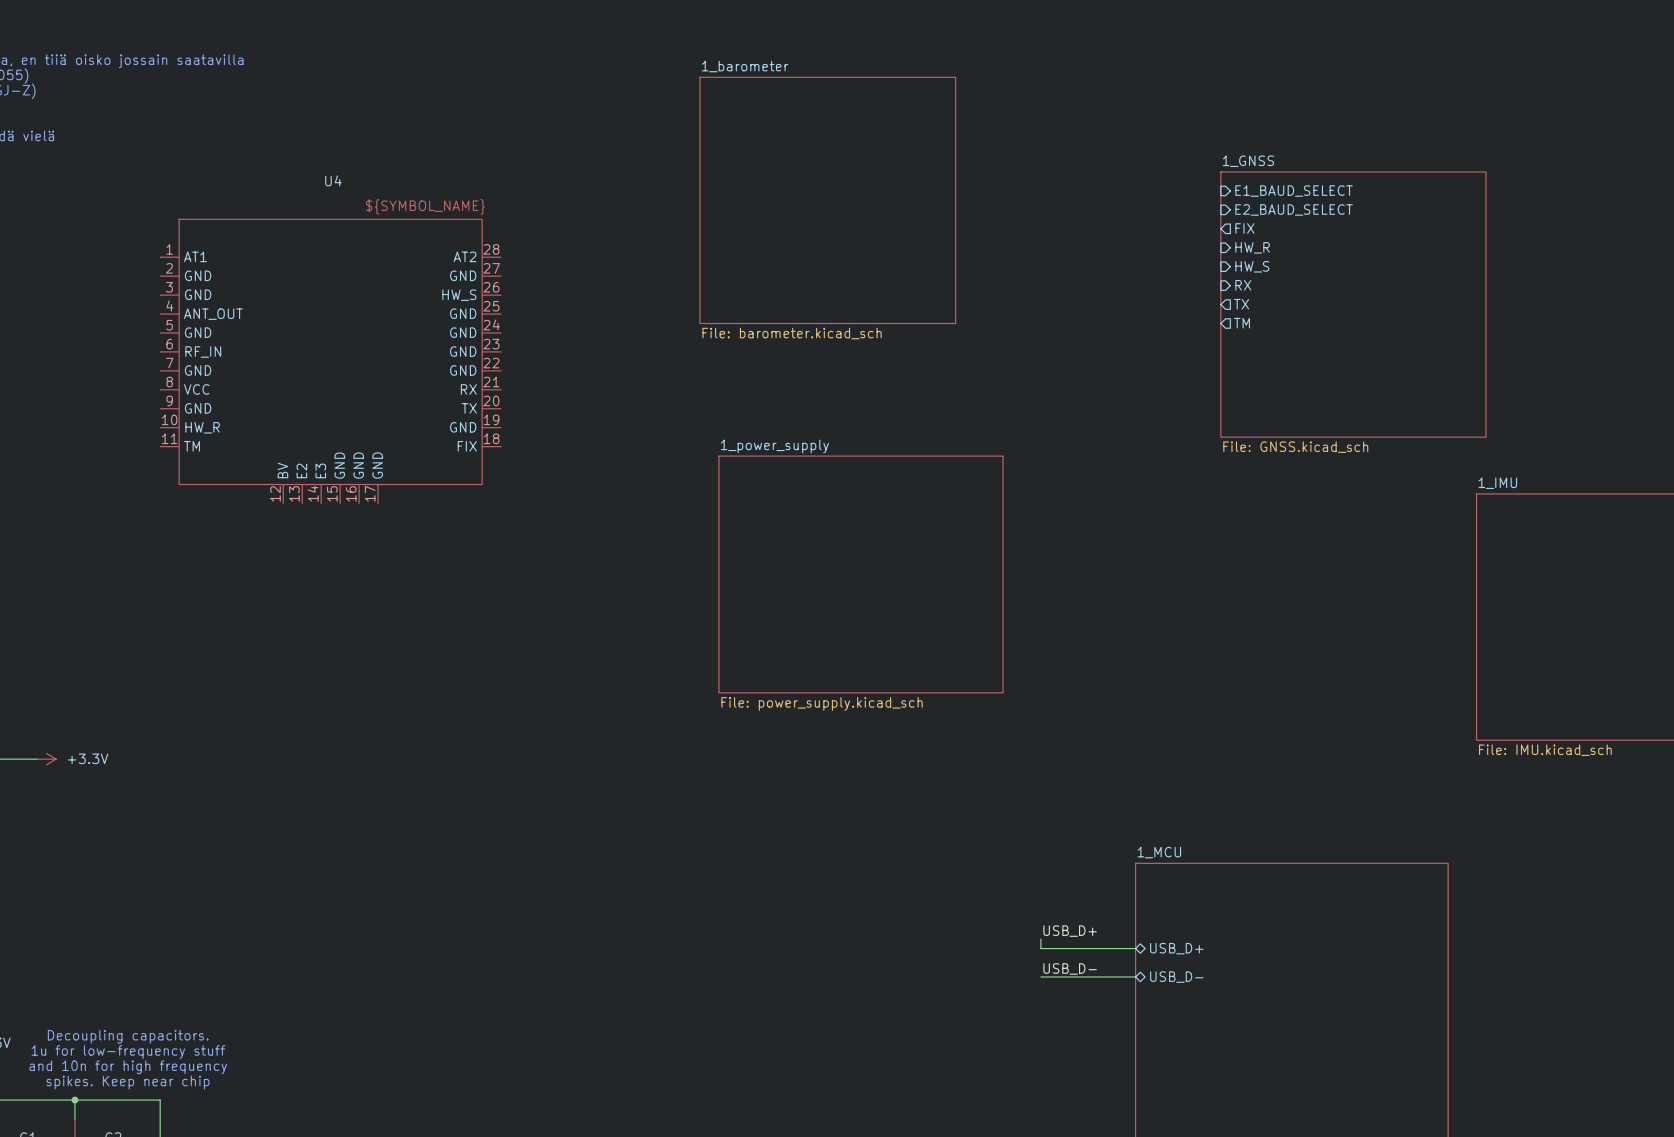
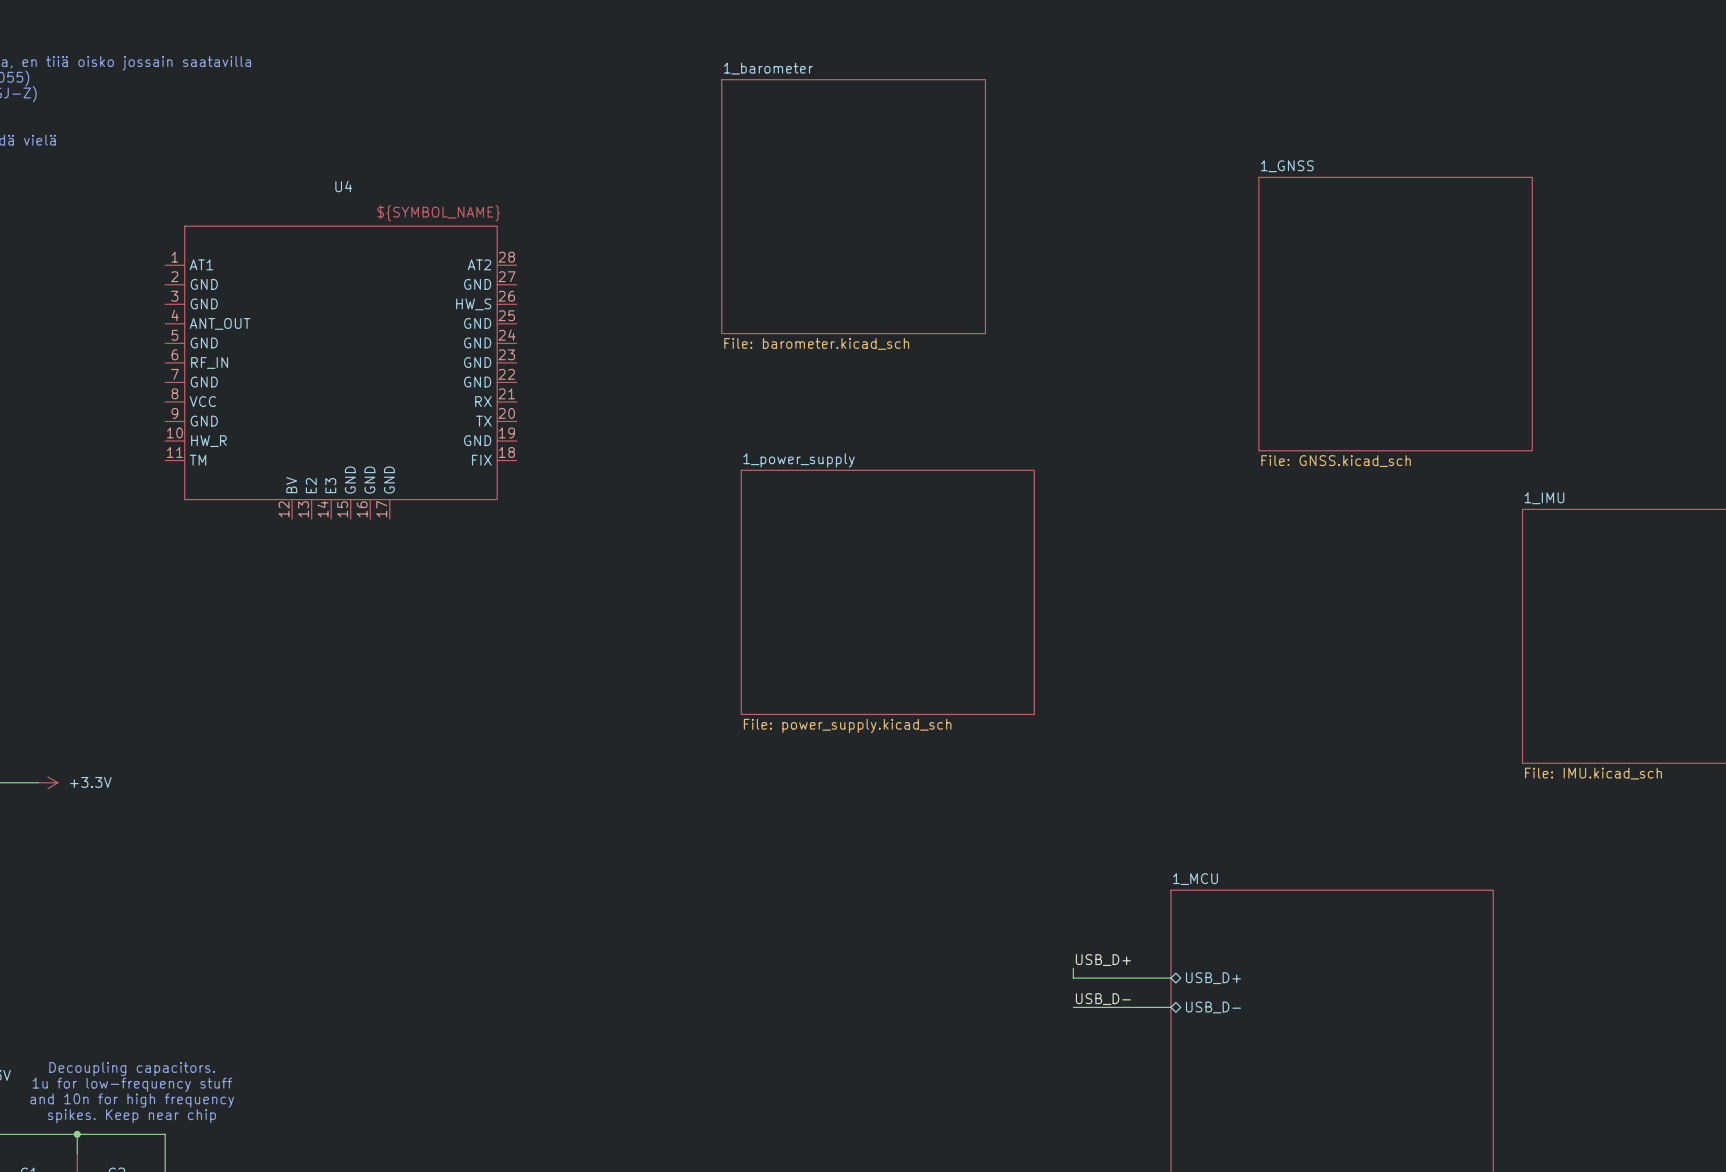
sheet pin: E1_BAUD_SELECT (1294, 191) -> none
sheet pin: E2_BAUD_SELECT (1294, 209) -> none
sheet pin: FIX (1244, 228) -> none
sheet pin: HW_R (1252, 247) -> none
sheet pin: HW_S (1252, 266) -> none
sheet pin: RX (1243, 285) -> none
sheet pin: TX (1241, 304) -> none
sheet pin: TM (1241, 323) -> none

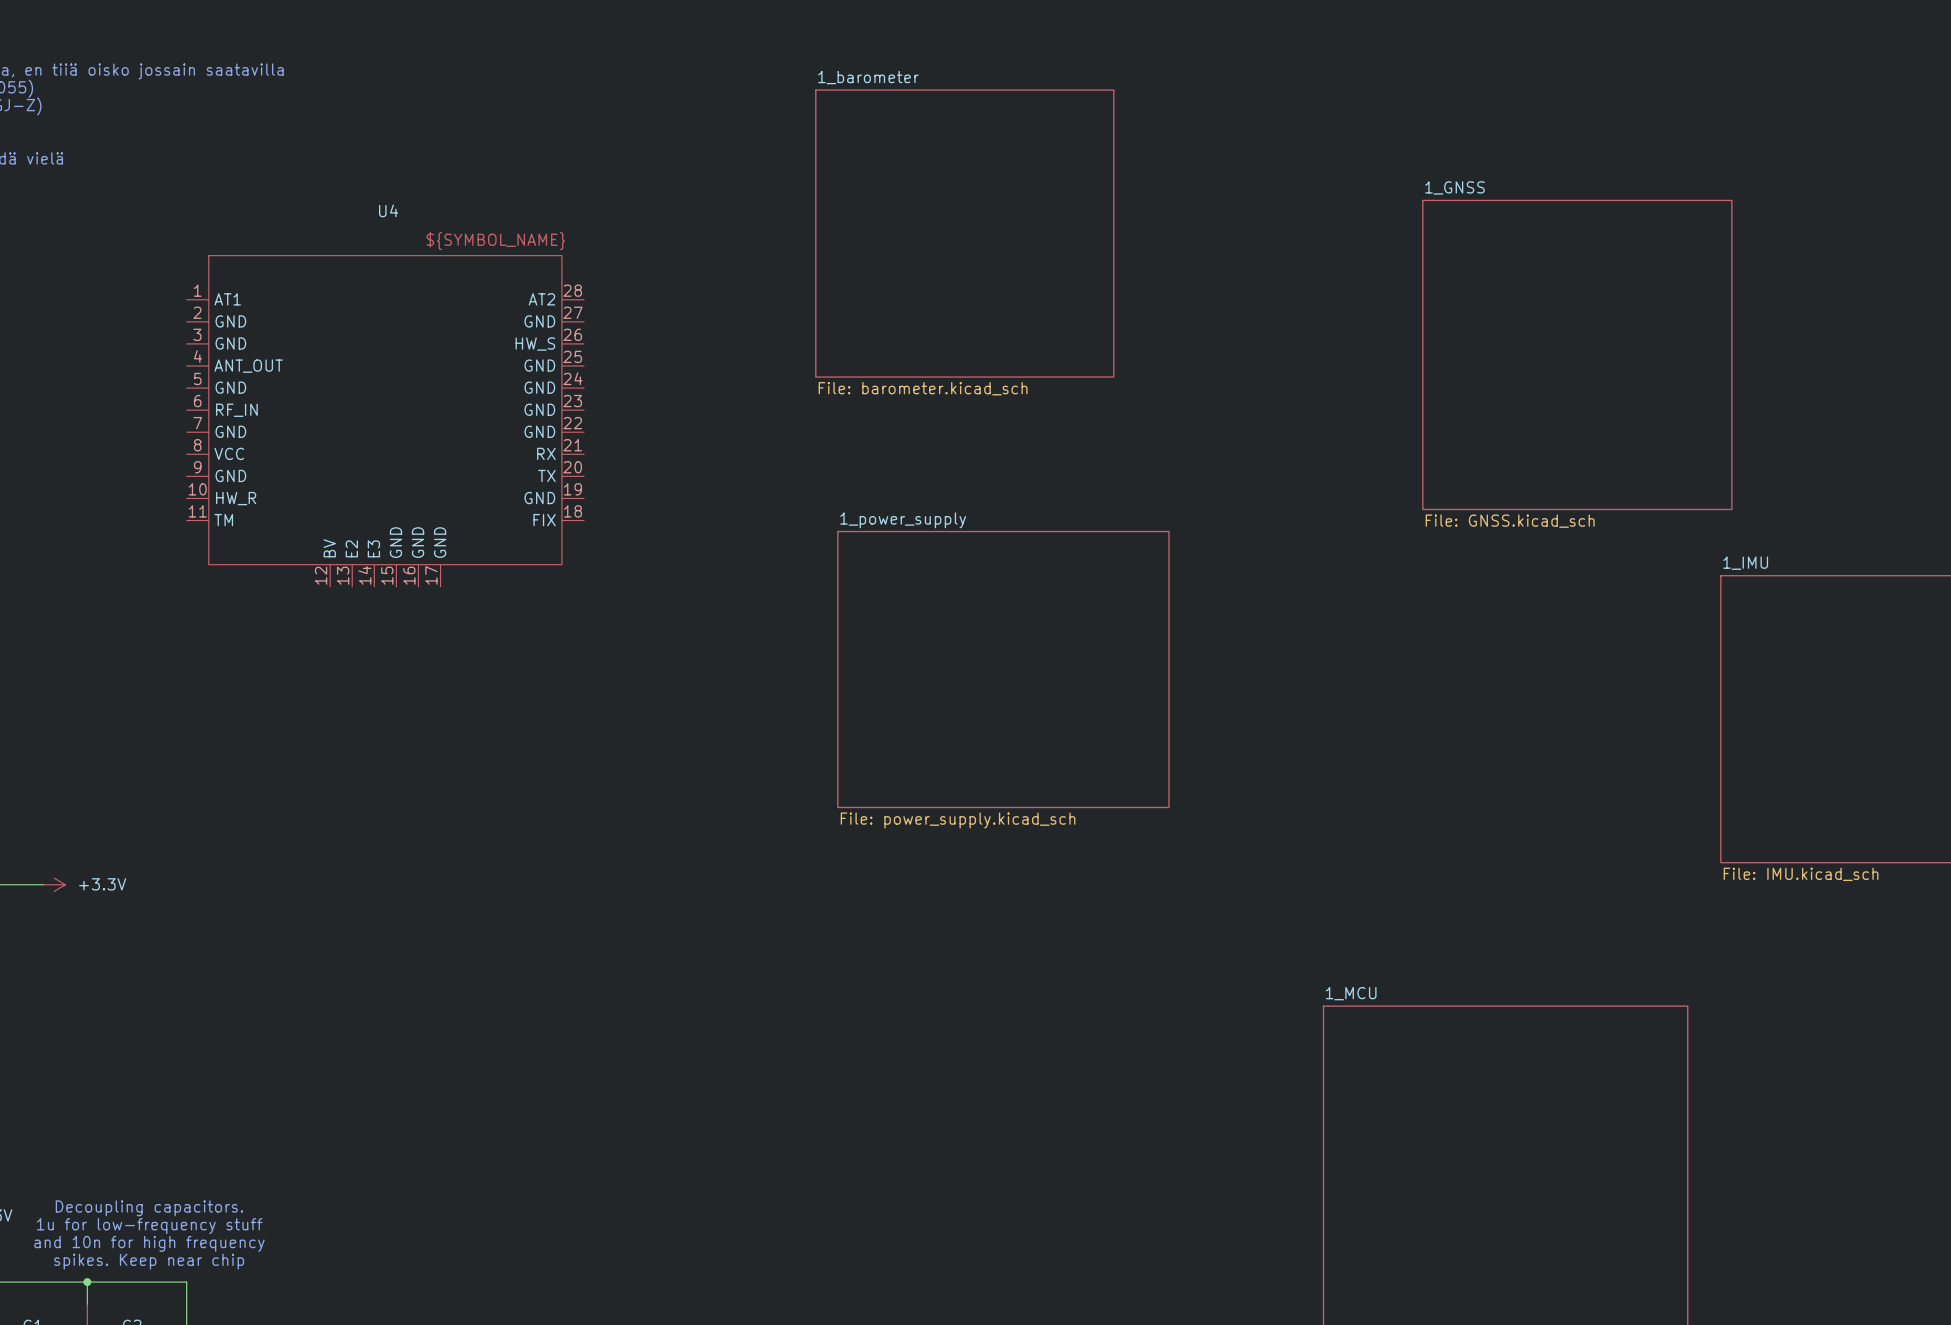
label: USB_D+ (1103, 960) -> none
wire: (1073, 968) (1073, 978) (1170, 978) -> none
sheet pin: USB_D+ (1213, 978) -> none
label: USB_D- (1103, 999) -> none
wire: (1073, 1007) (1170, 1007) -> none
sheet pin: USB_D- (1213, 1007) -> none

